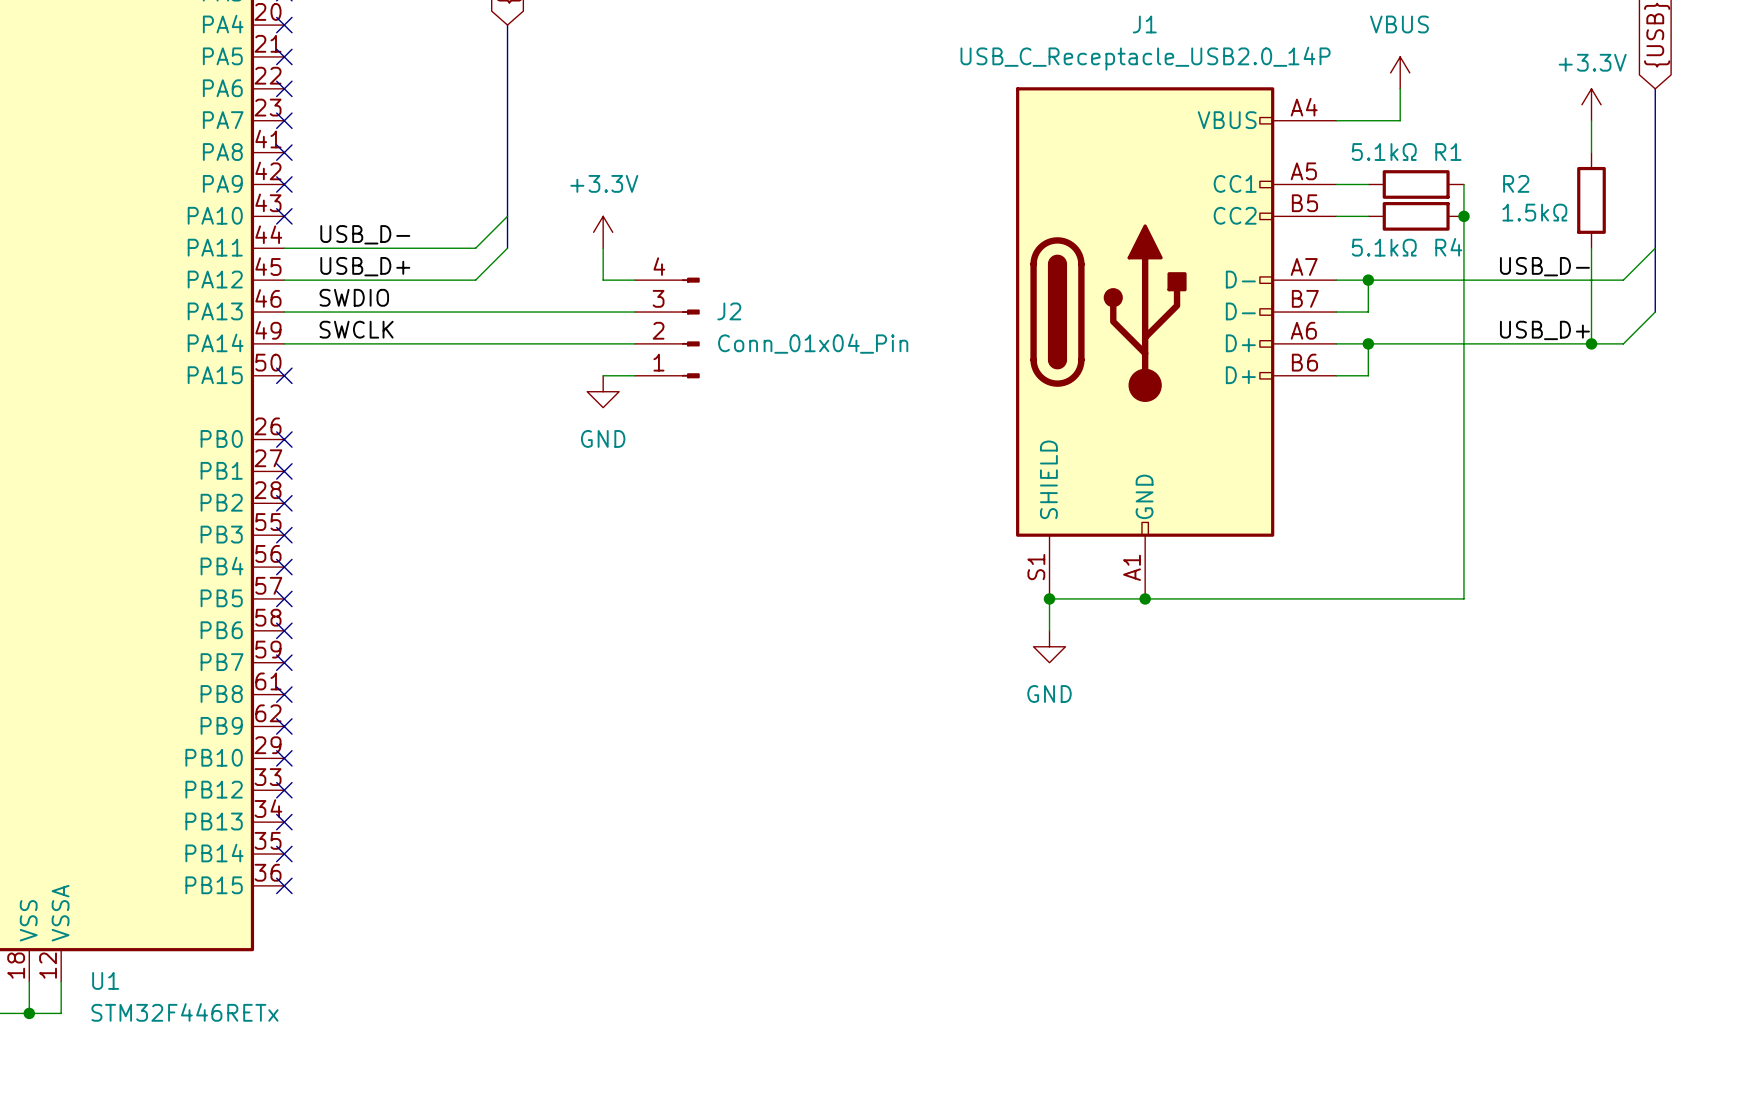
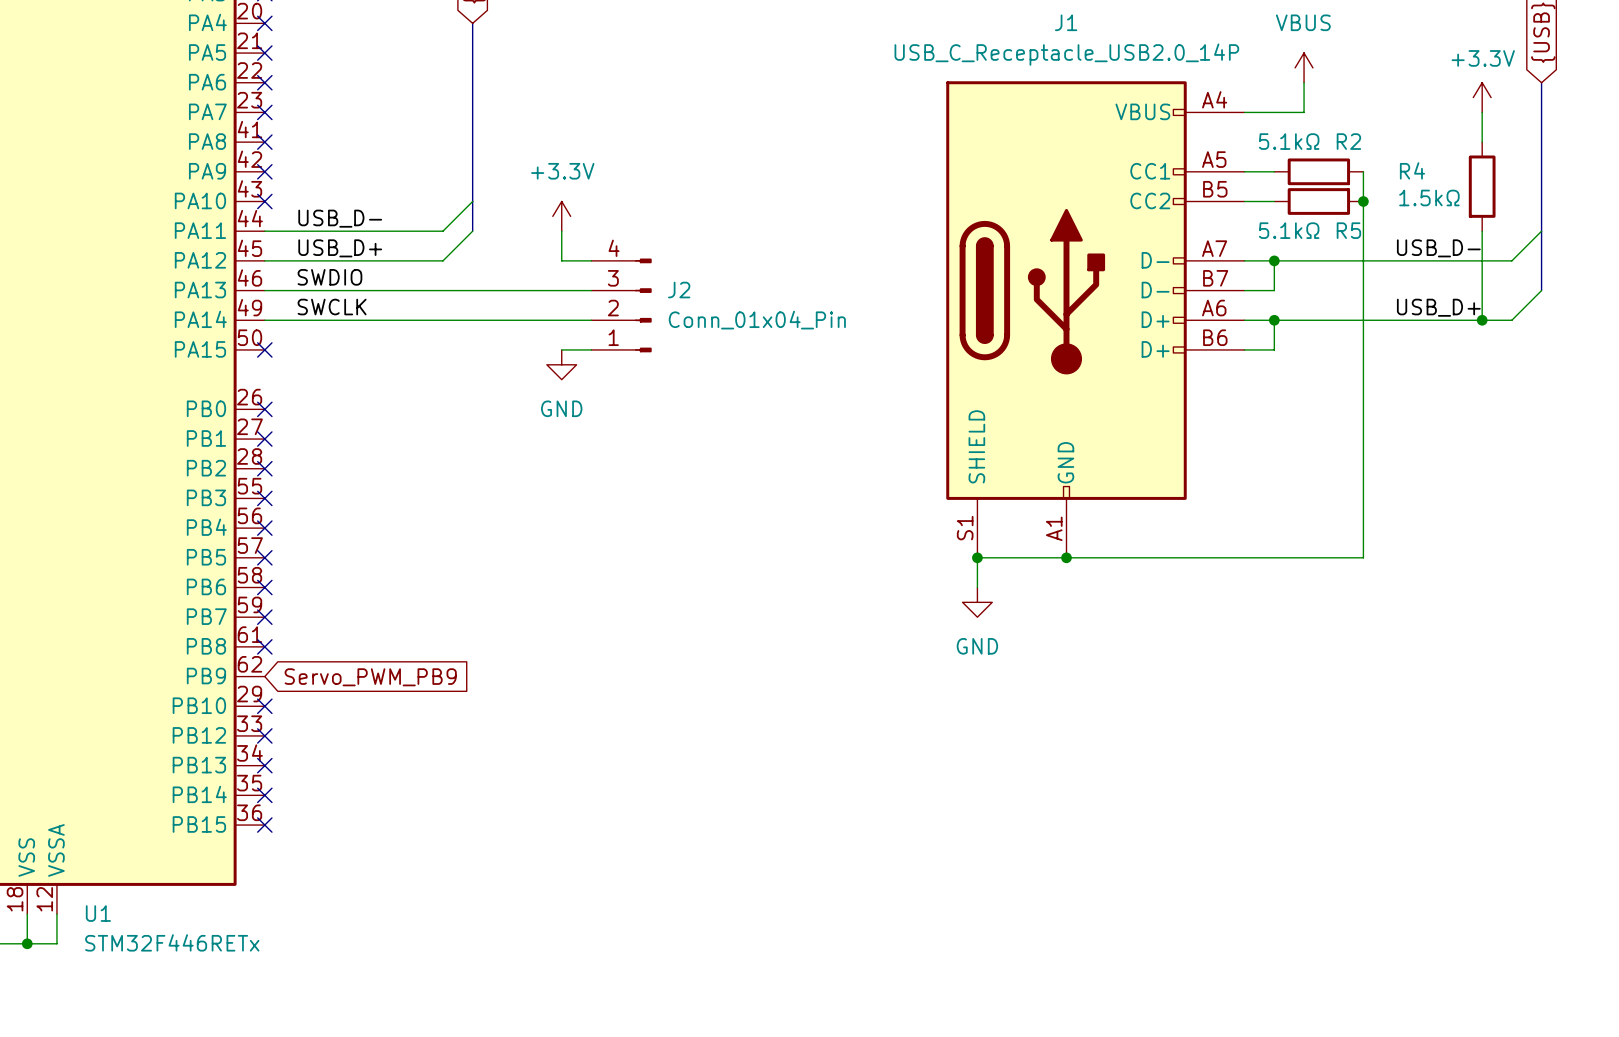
R1 name: R1 (1448, 152) -> R2 (1348, 141)
R2 name: R2 (1516, 183) -> R4 (1412, 170)
R4 name: R4 (1448, 247) -> R5 (1348, 230)
no-connect mark: (284, 726) -> none
global label: none -> Servo_PWM_PB9 (370, 677)

